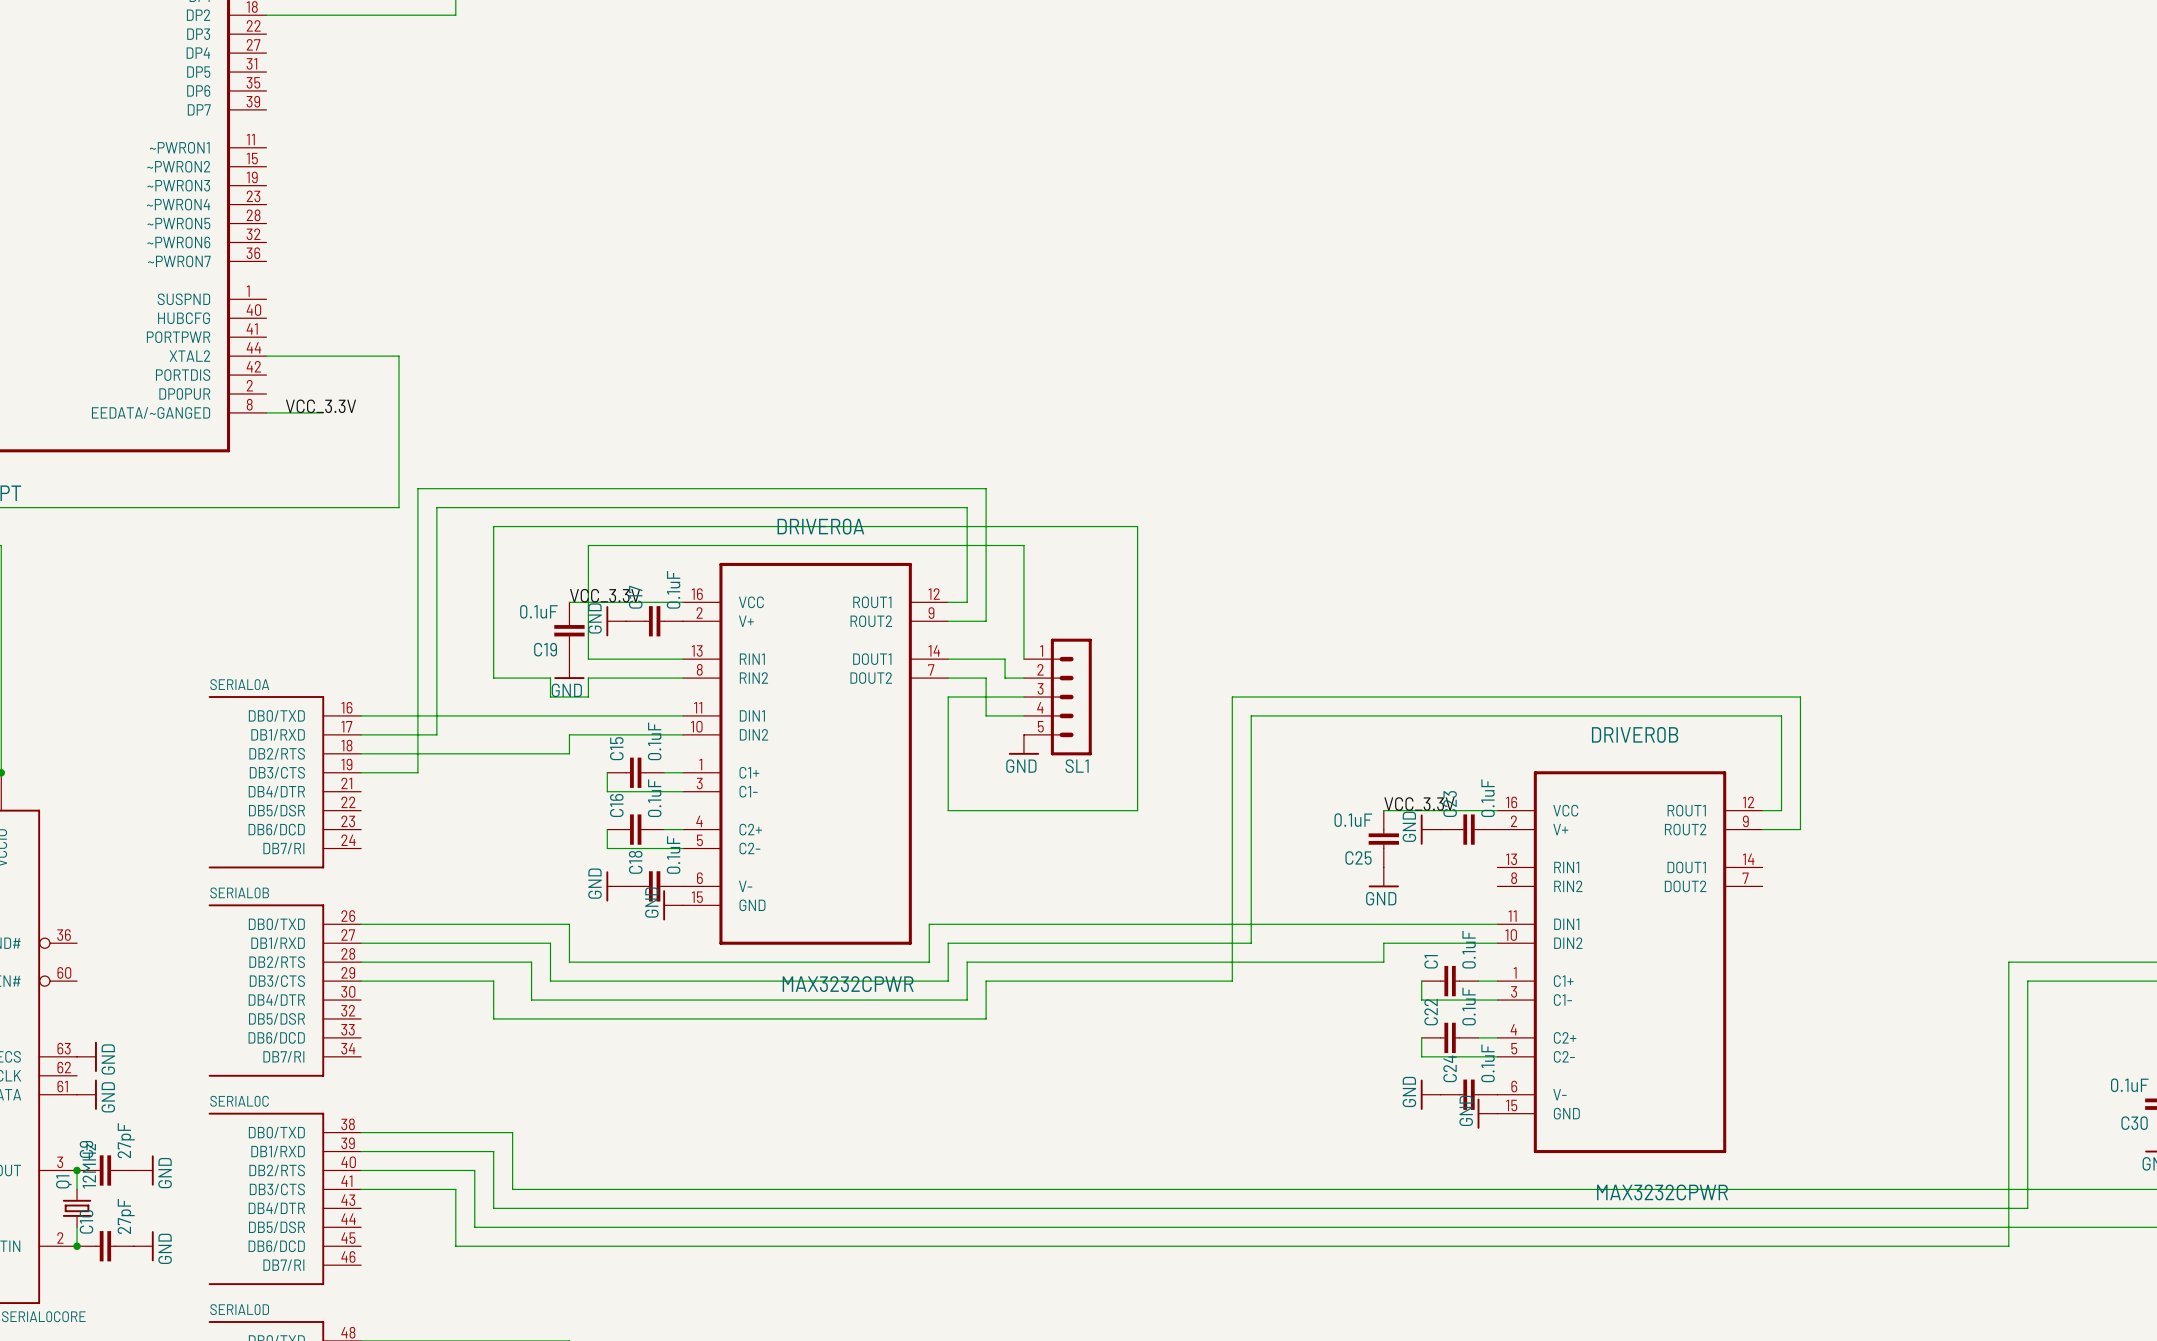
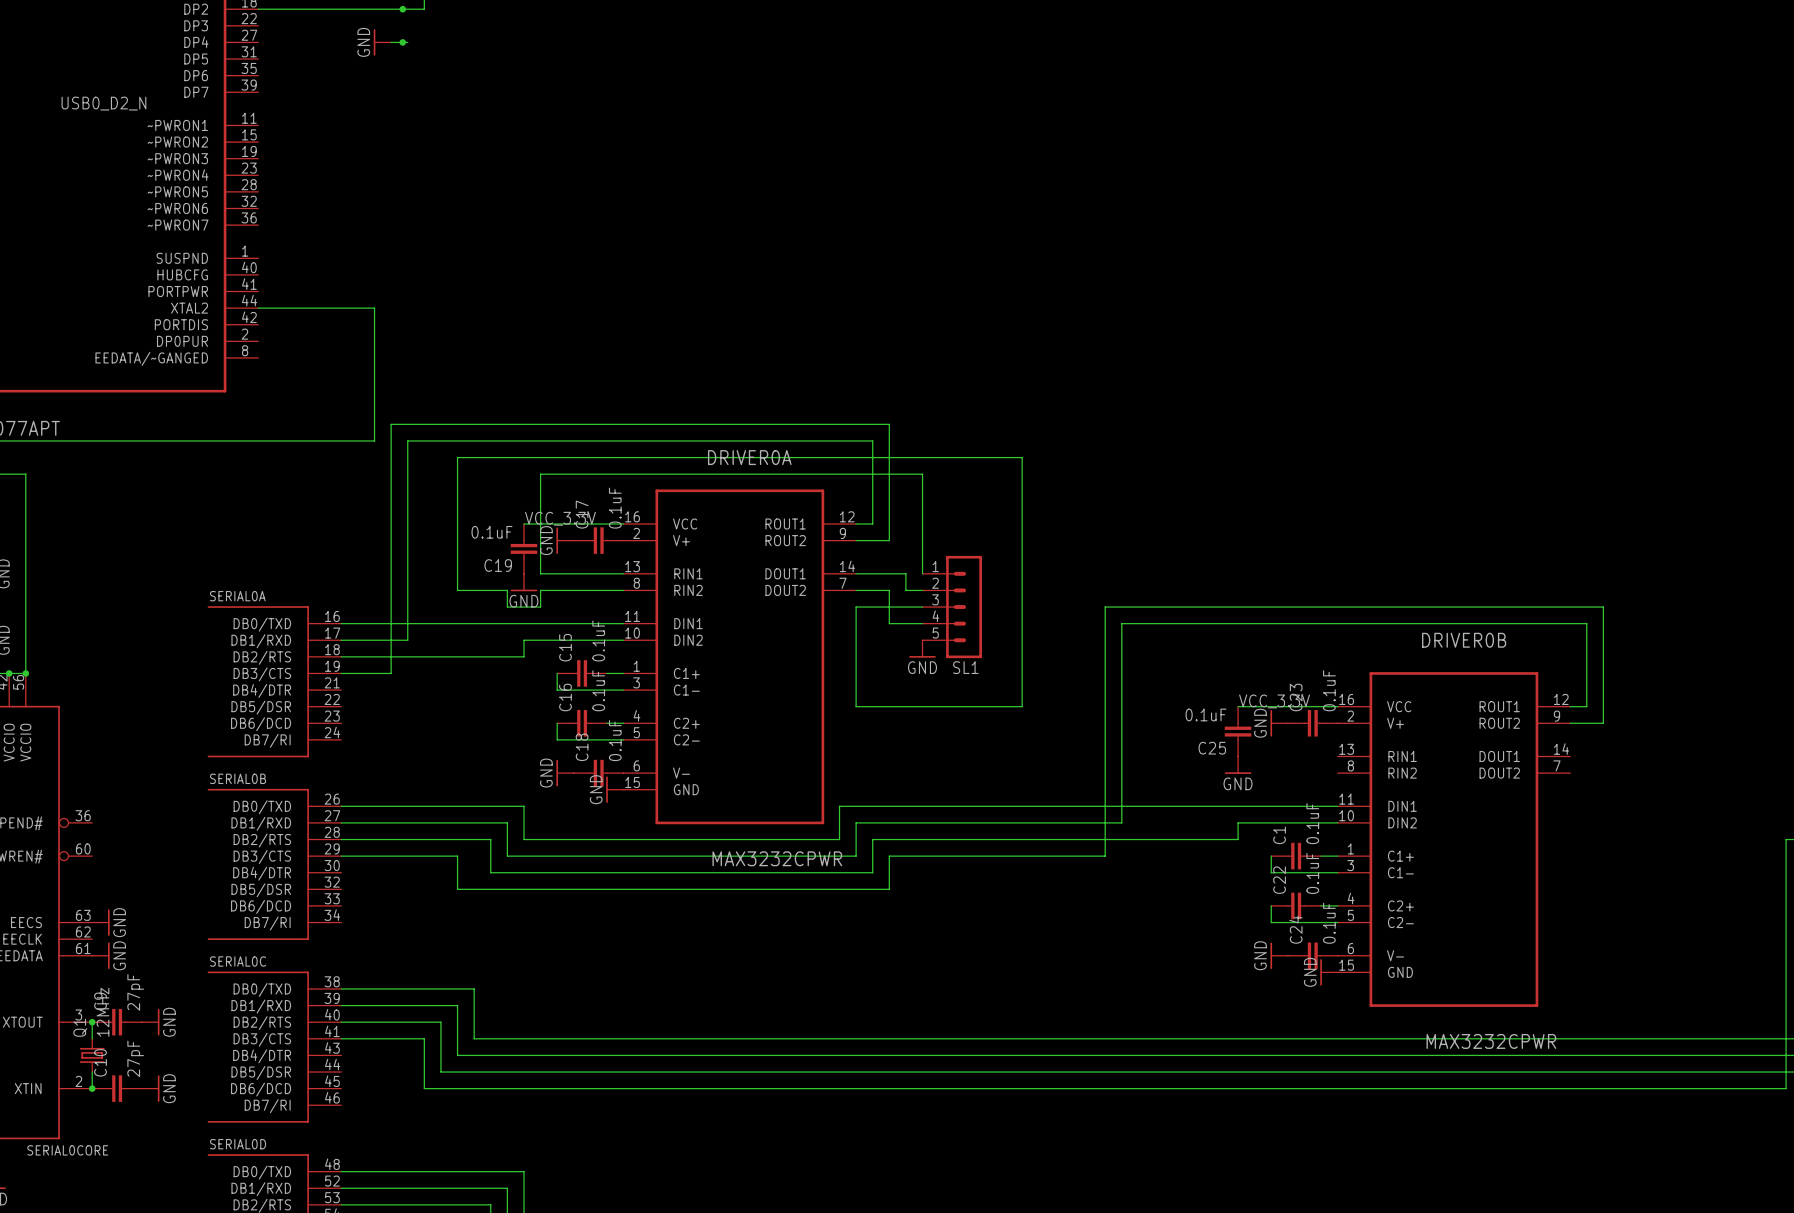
junction: none -> (402, 9)
power symbol: none -> GND (382, 42)
wire: none -> (391, 42) (407, 42)
junction: none -> (402, 42)
label: none -> USB0_D2_N (103, 103)
label: VCC_3.3V (321, 406) -> none
wire: (266, 412) (323, 412) -> none

